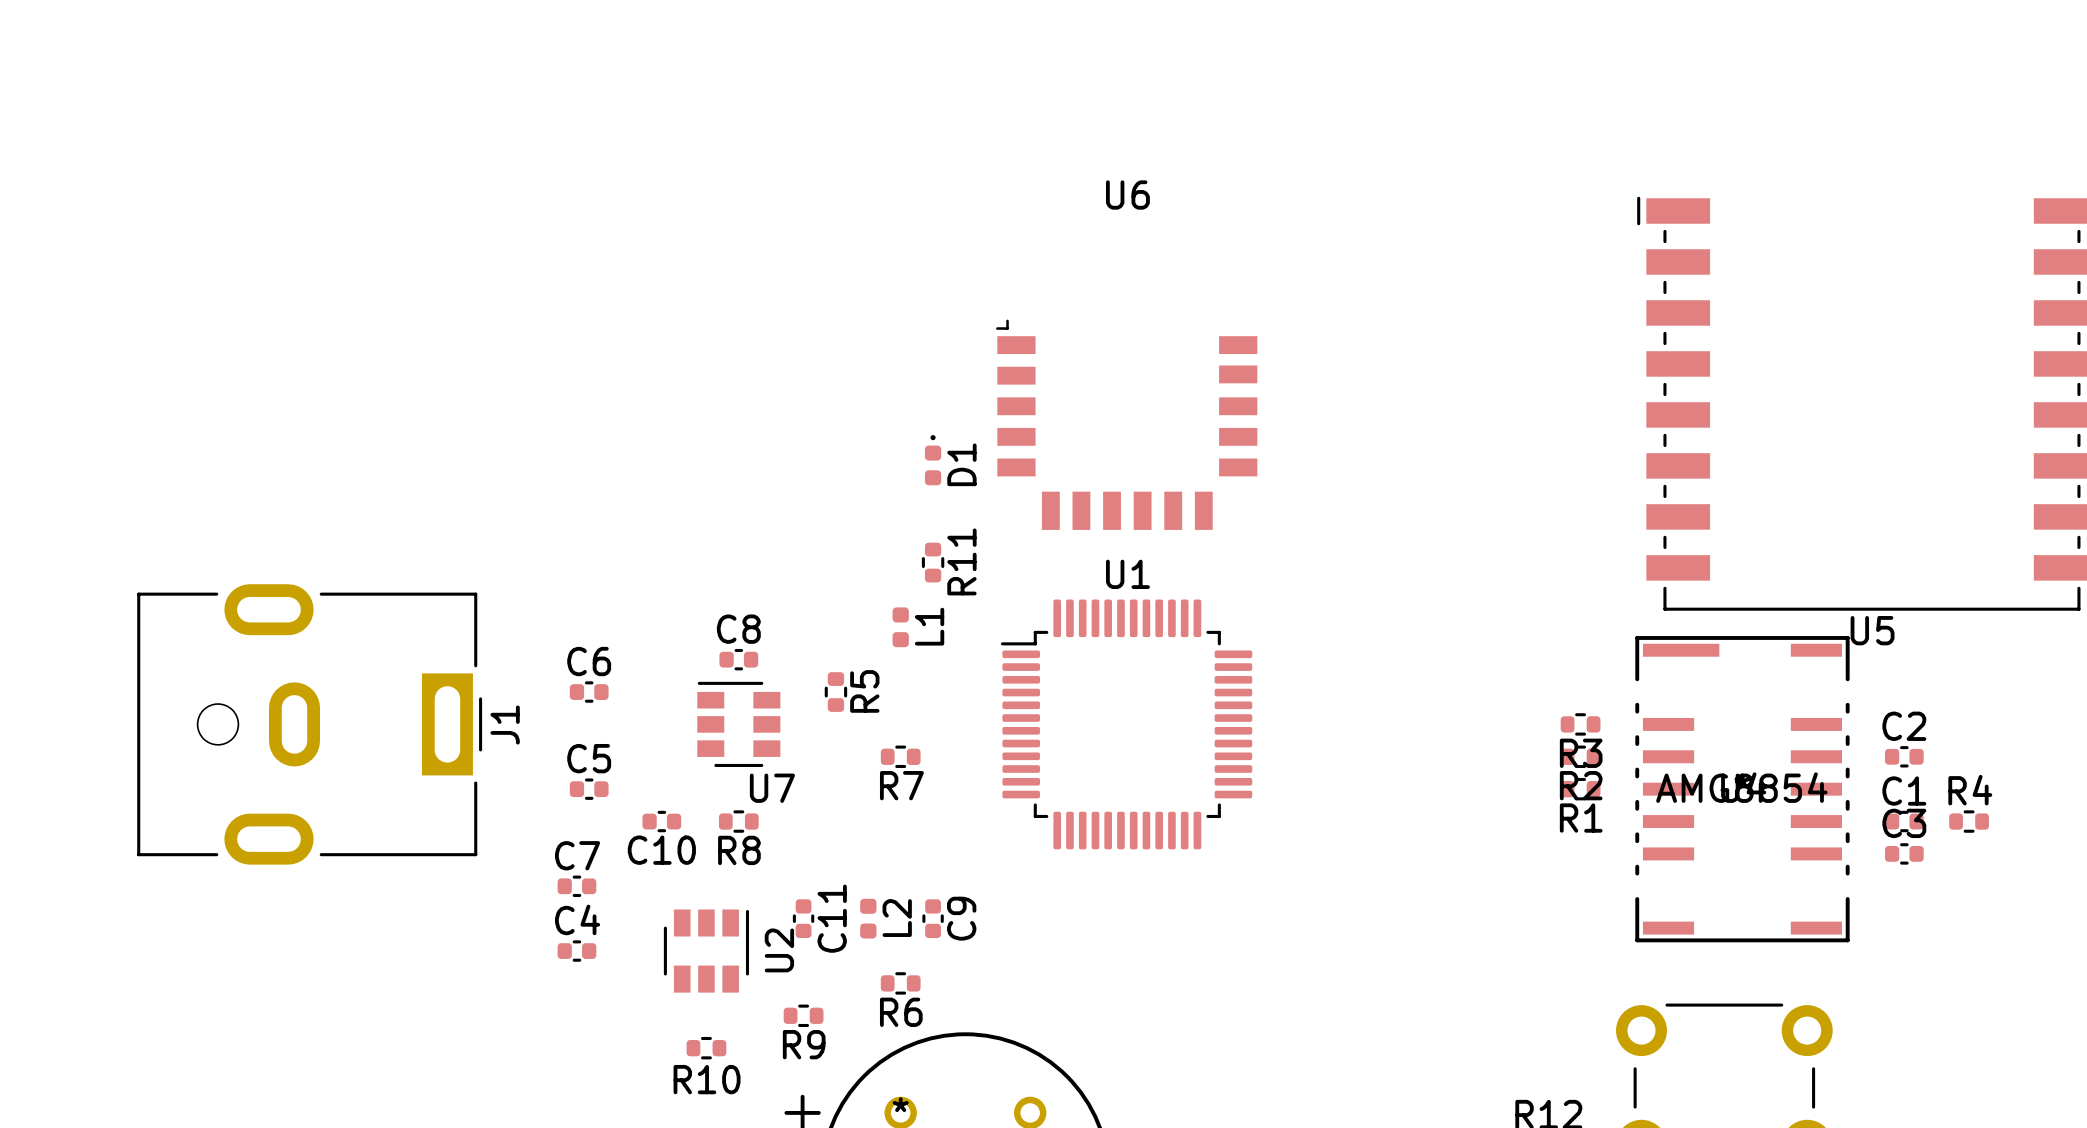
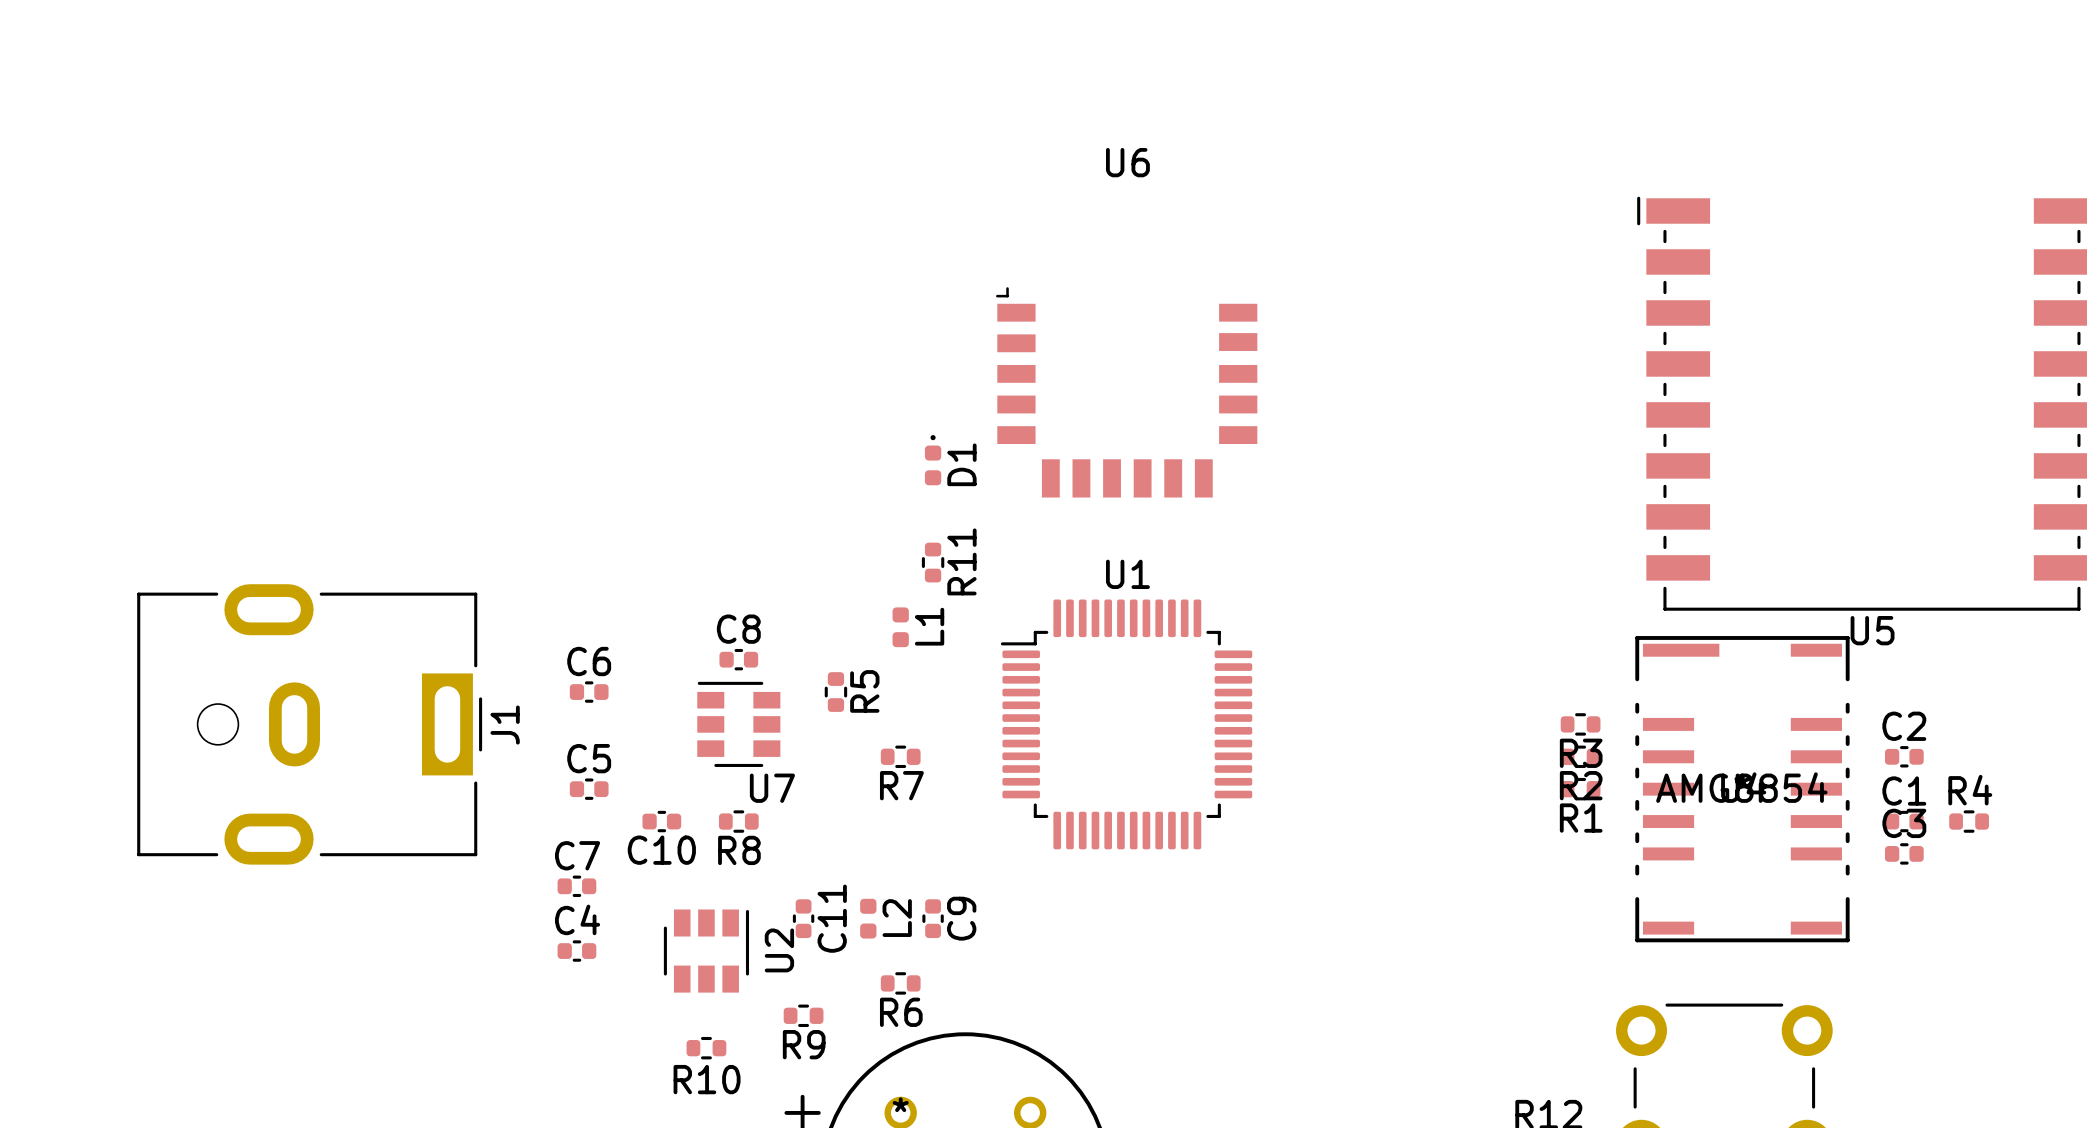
U6 position: (1126, 424) -> (1126, 392)

